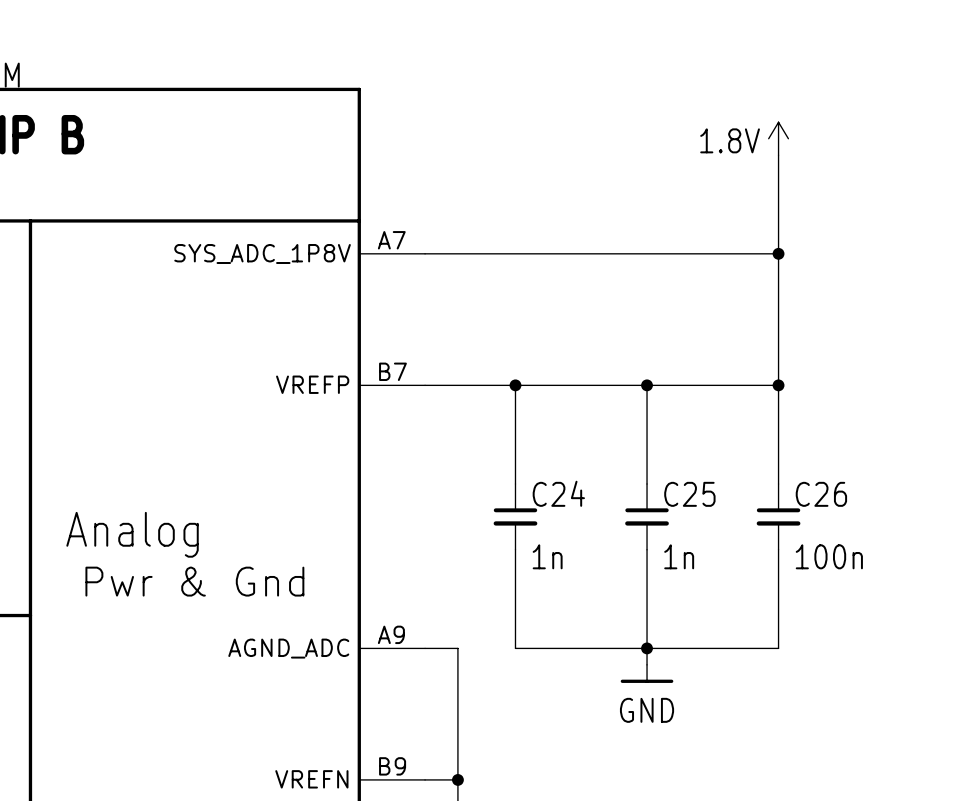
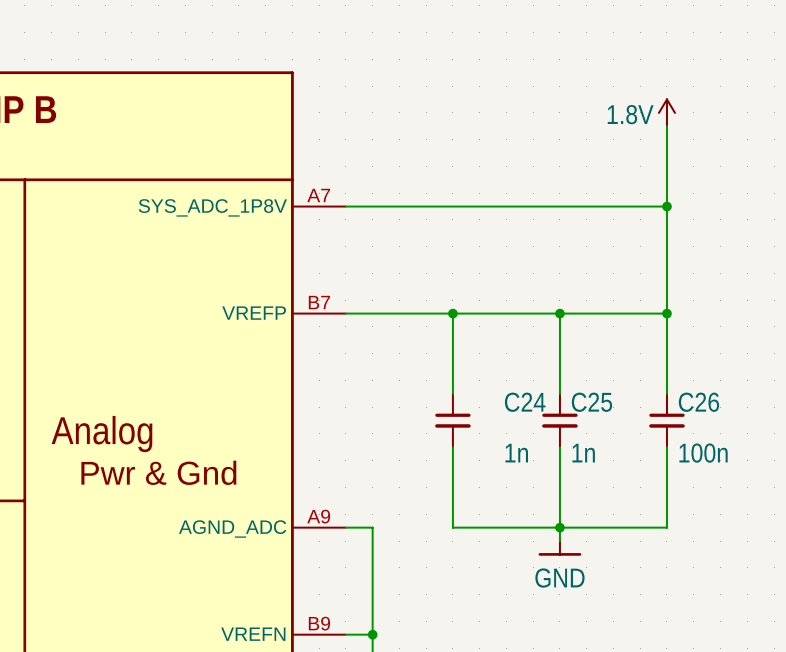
power symbol position: 1.8V (778, 138) -> 1.8V (666, 112)
wire: (778, 155) (778, 484) -> (666, 126) (666, 393)
wire: none -> (633, 206) (666, 206)
junction position: (778, 253) -> (666, 206)
wire: (515, 385) (515, 484) -> (452, 313) (452, 393)
junction position: (515, 385) -> (452, 313)
wire: (647, 385) (647, 484) -> (559, 313) (559, 393)
junction position: (647, 385) -> (559, 313)
wire: none -> (633, 313) (666, 313)
junction position: (778, 385) -> (666, 313)
C24 name position: C24 (558, 493) -> C24 (525, 402)
C24 position: (515, 516) -> (452, 420)
C25 position: (647, 516) -> (559, 420)
C26 position: (778, 516) -> (666, 420)
wire: (515, 549) (515, 648) (556, 648) -> (452, 447) (452, 527)
wire: (647, 549) (647, 664) -> (559, 447) (559, 541)
wire: (778, 549) (778, 648) -> (666, 447) (666, 527) (633, 527)
C24 value position: 1n (547, 556) -> 1n (516, 453)
junction position: (647, 648) -> (559, 527)
power symbol position: GND (647, 673) -> GND (559, 548)

